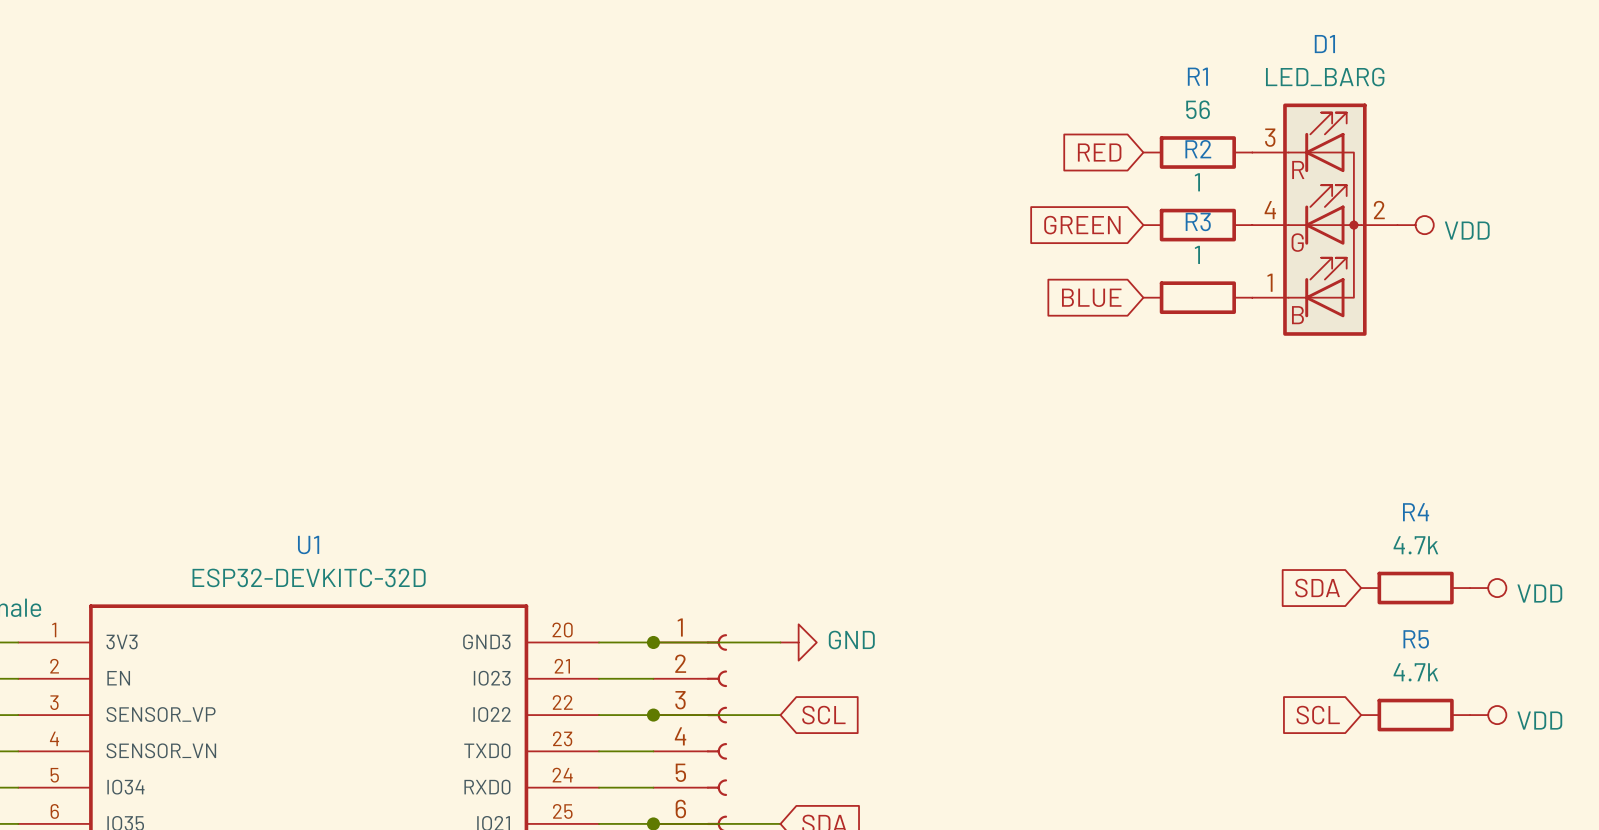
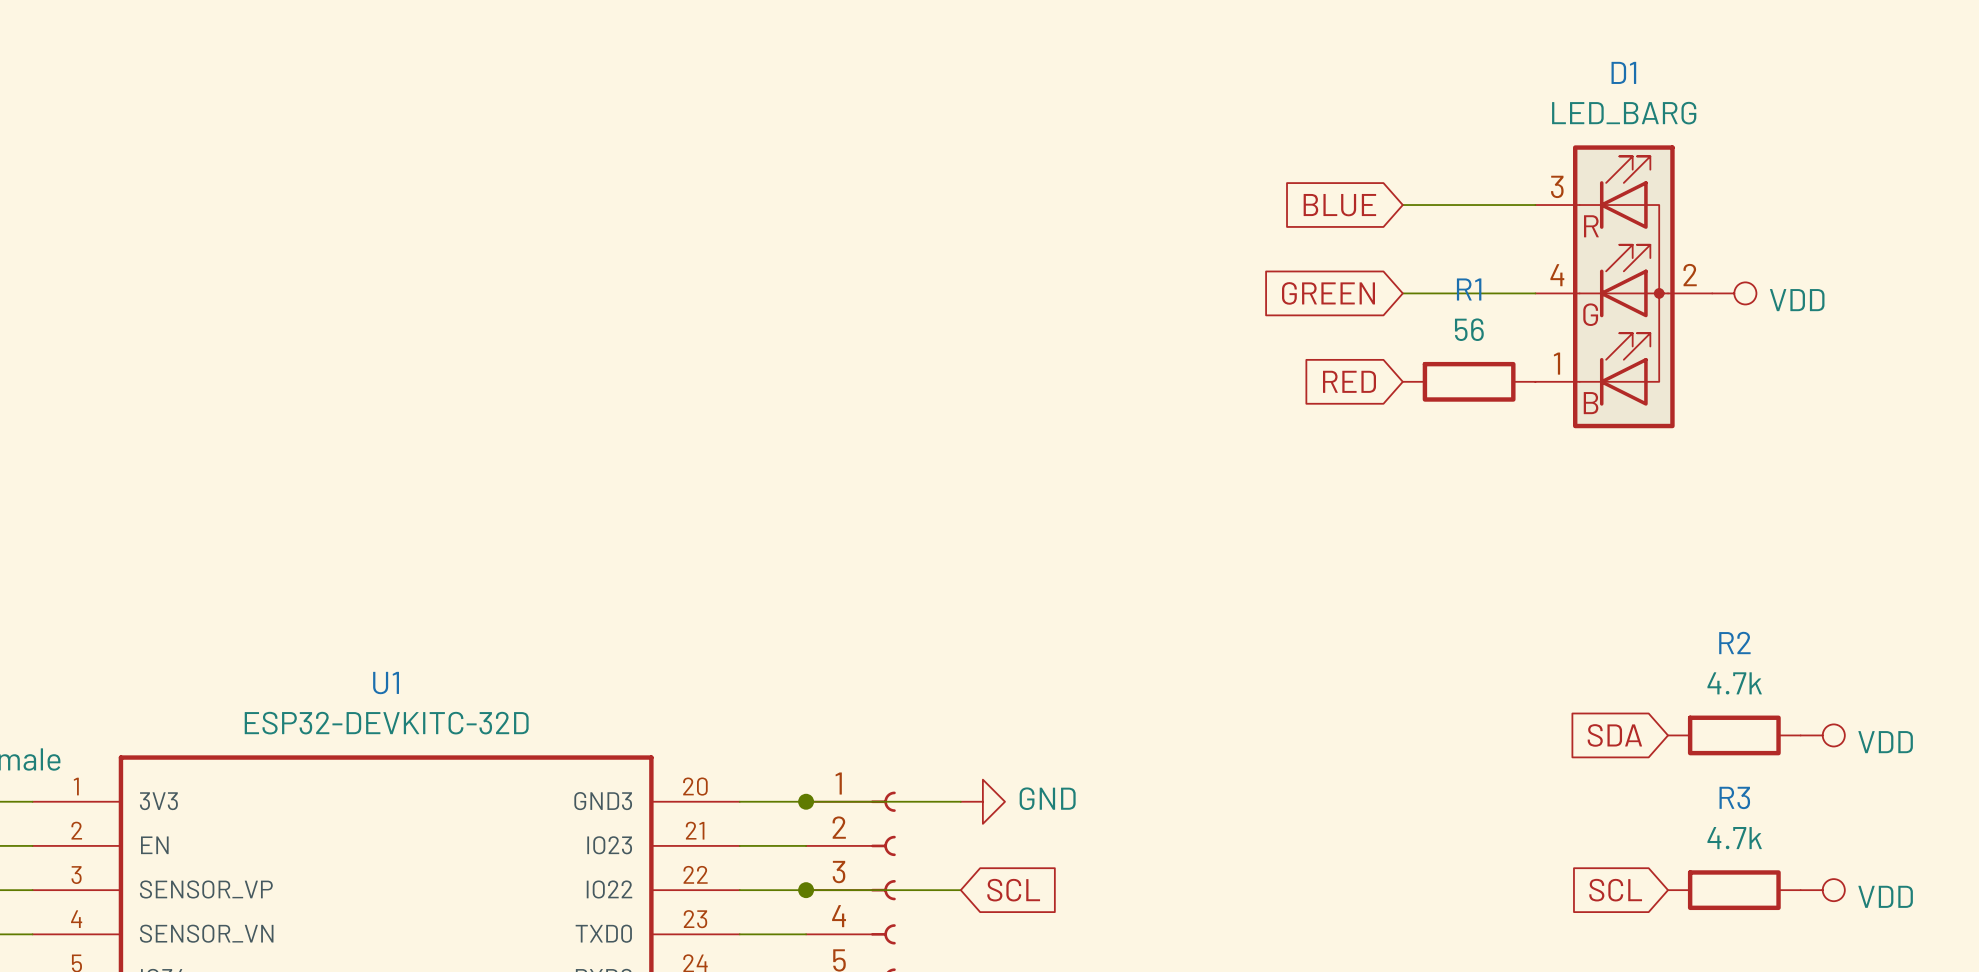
global label: RED (1099, 152) -> BLUE (1339, 205)
wire: none -> (1402, 205) (1535, 205)
R1: 56 (1197, 152) -> none
R3 name: R3 (1198, 221) -> R1 (1469, 289)
wire: none -> (1402, 293) (1535, 293)
R2: 1 (1197, 225) -> none
R3 value: 1 (1197, 254) -> 56 (1469, 329)
global label: BLUE (1091, 297) -> RED (1349, 381)
R4 name: R4 (1416, 512) -> R2 (1734, 642)
R5 name: R5 (1416, 639) -> R3 (1734, 797)

